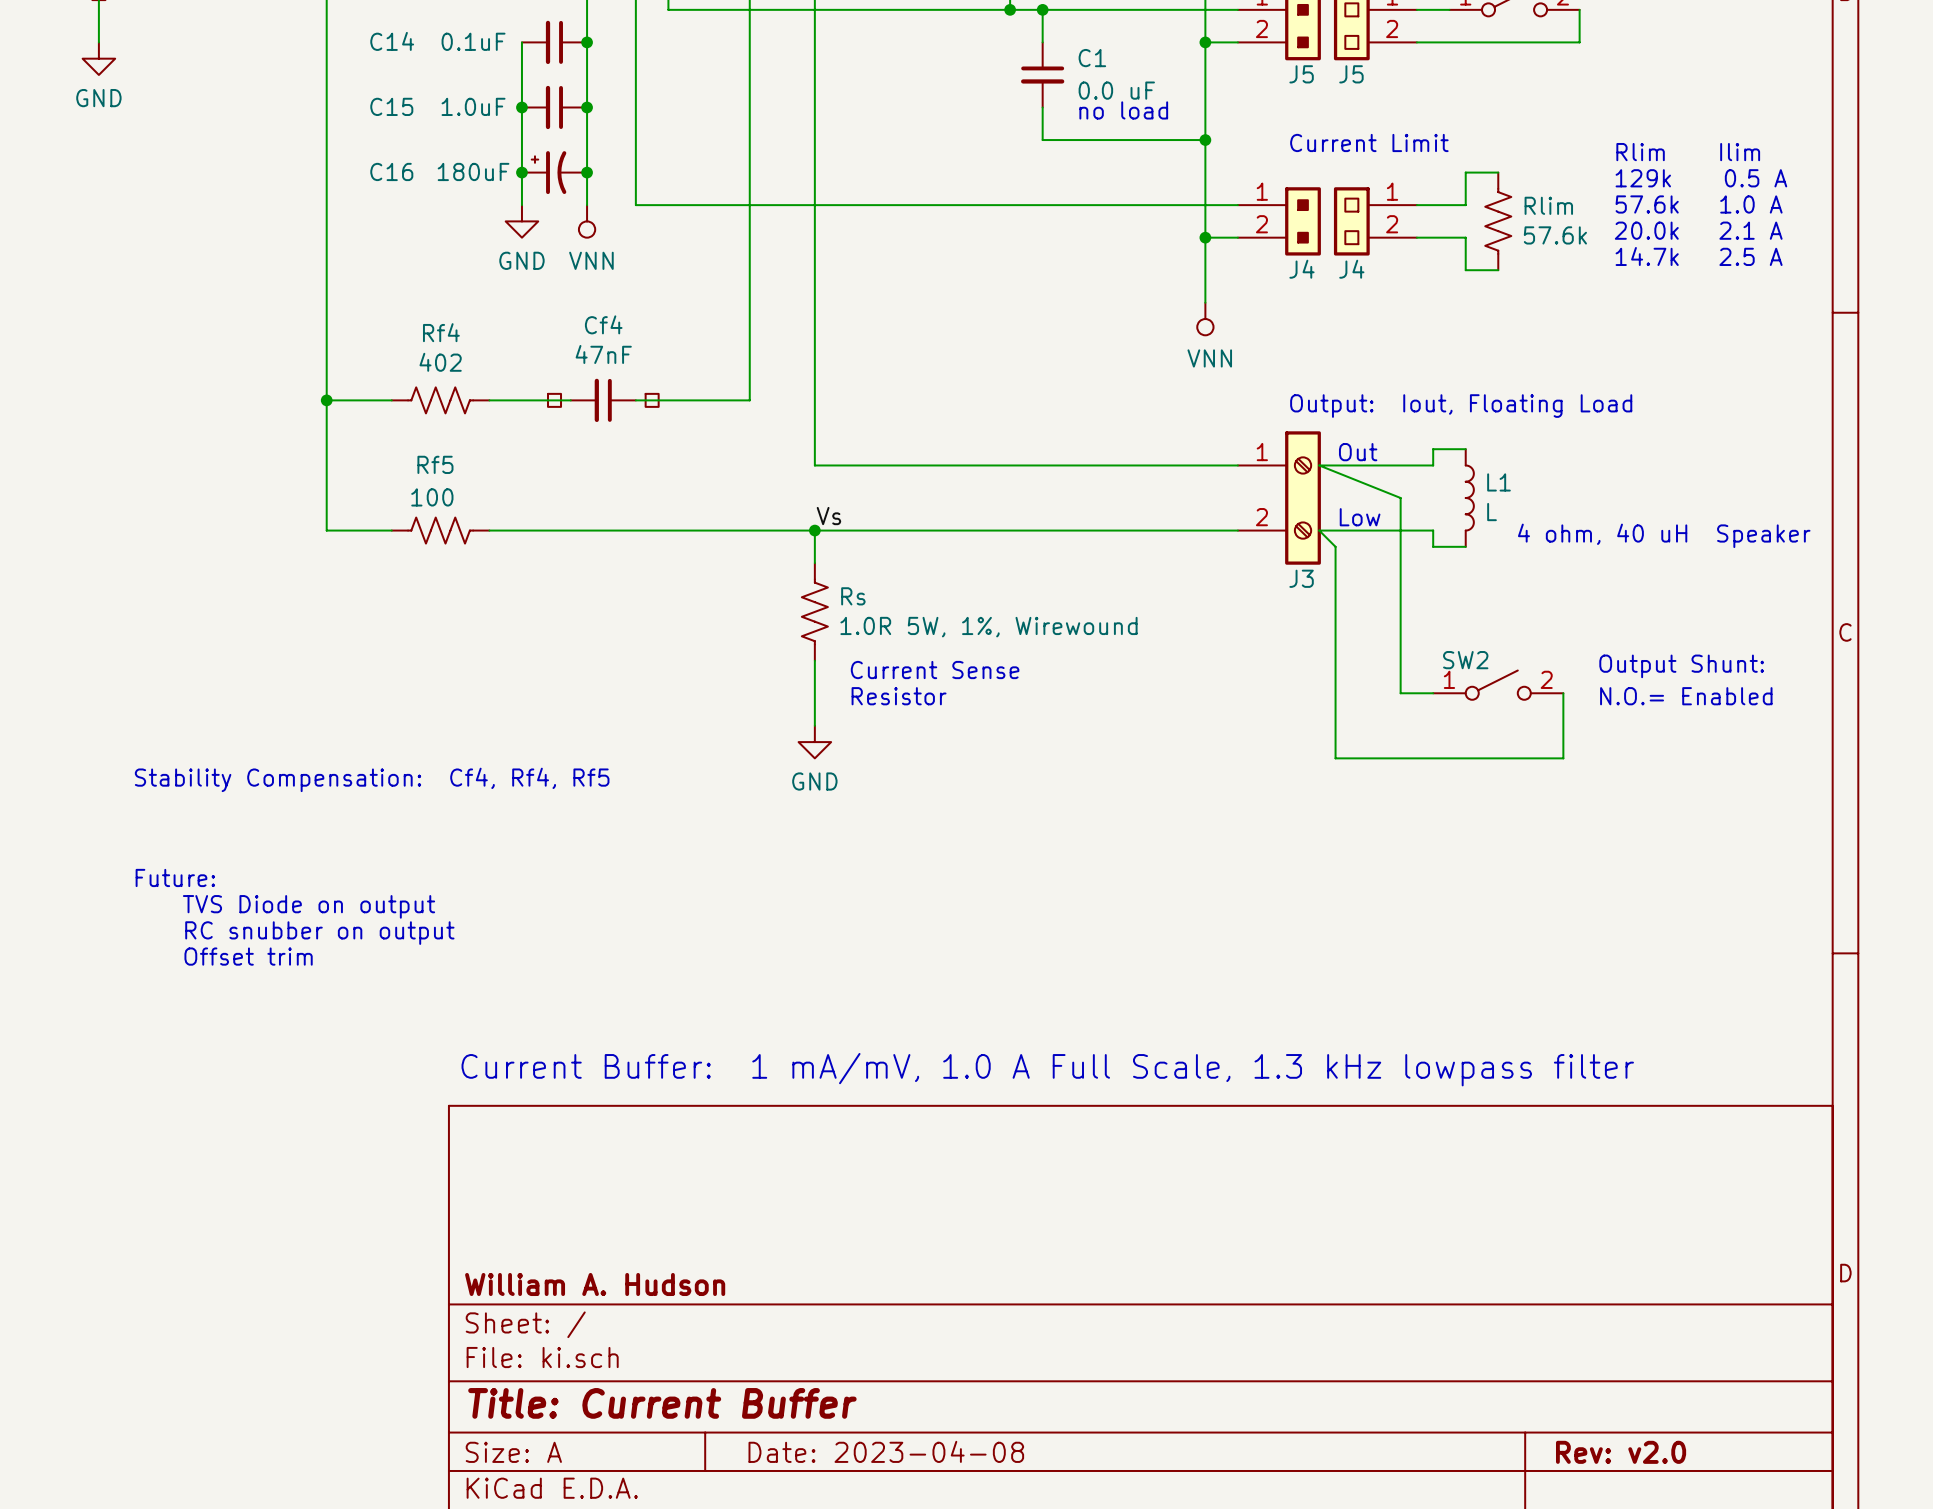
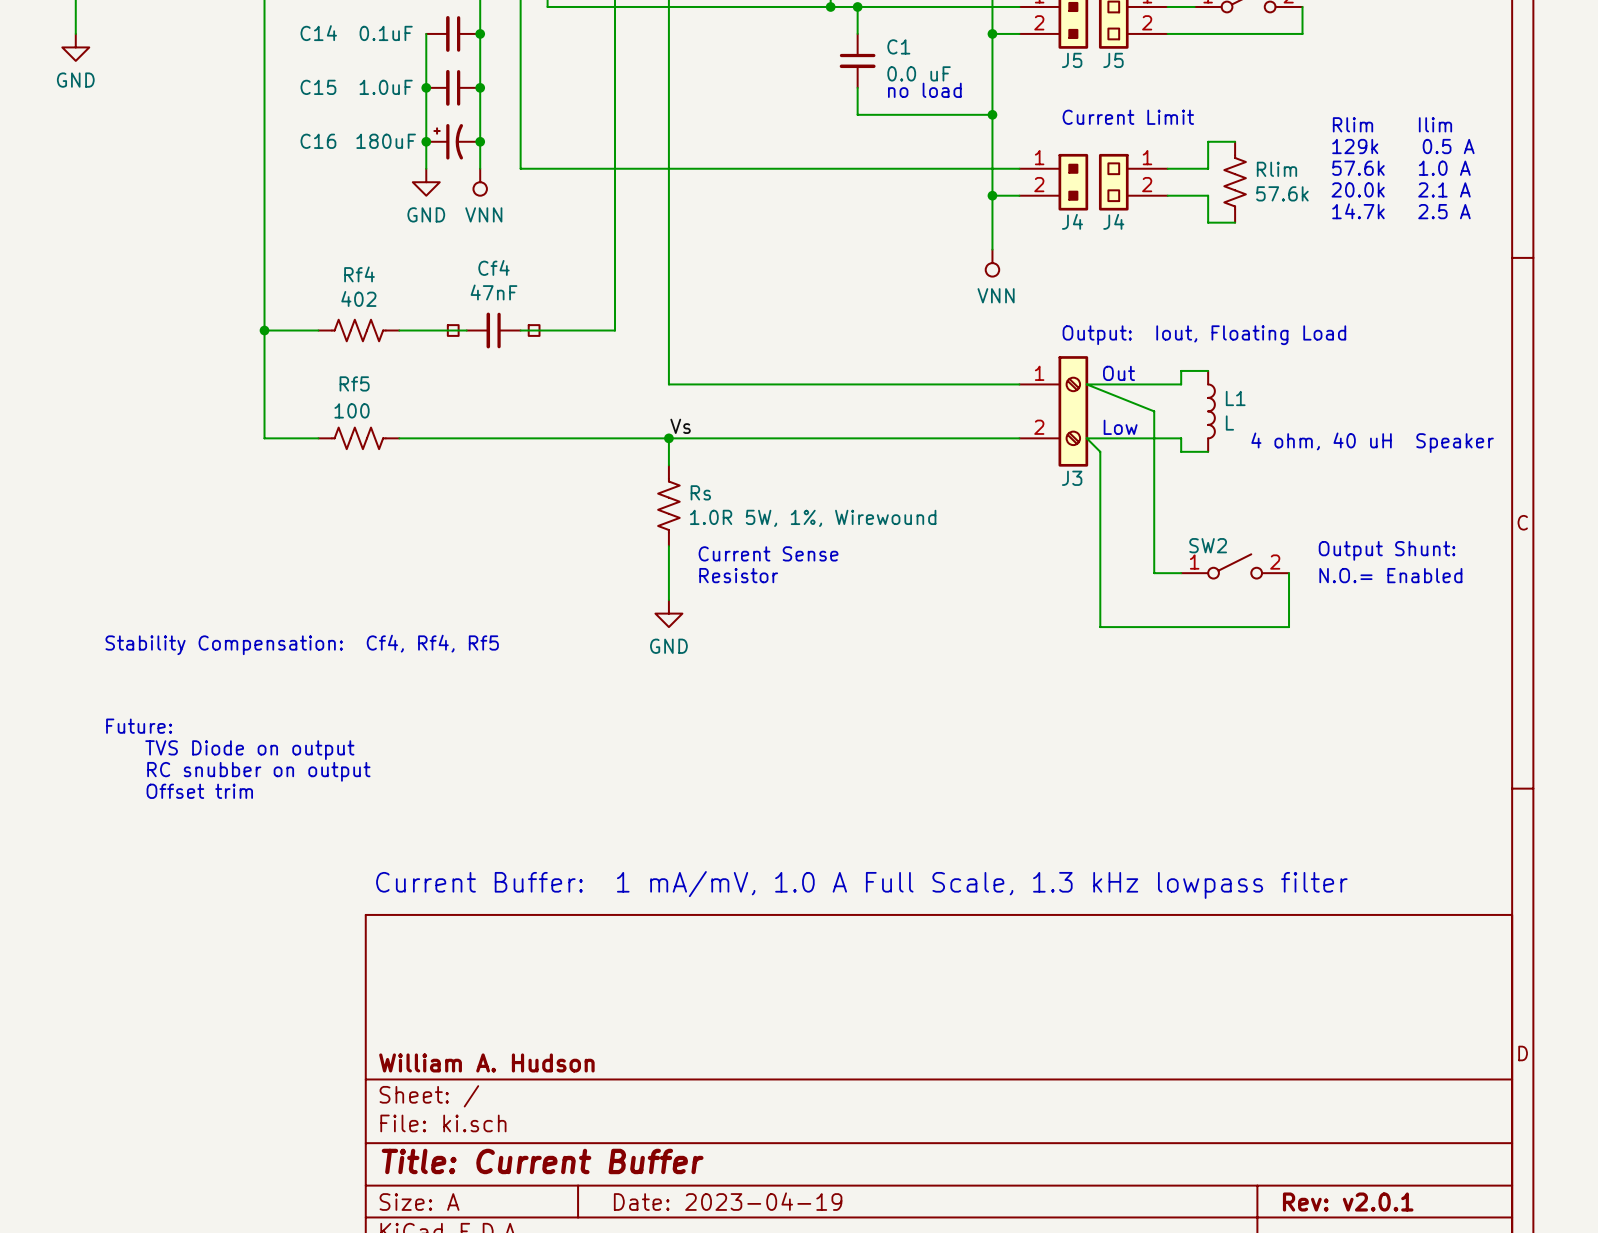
title block: Date: 2023-04-08 (886, 1451) -> Date: 2023-04-19 (728, 1201)
title block: Rev: v2.0 (1621, 1452) -> Rev: v2.0.1 (1348, 1202)

